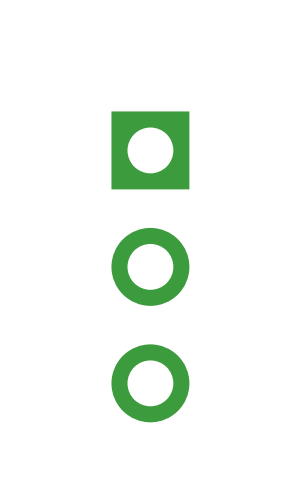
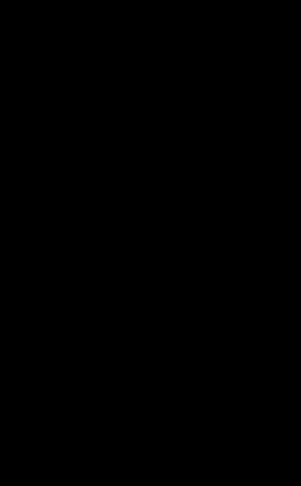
part: (150, 266) -> none

